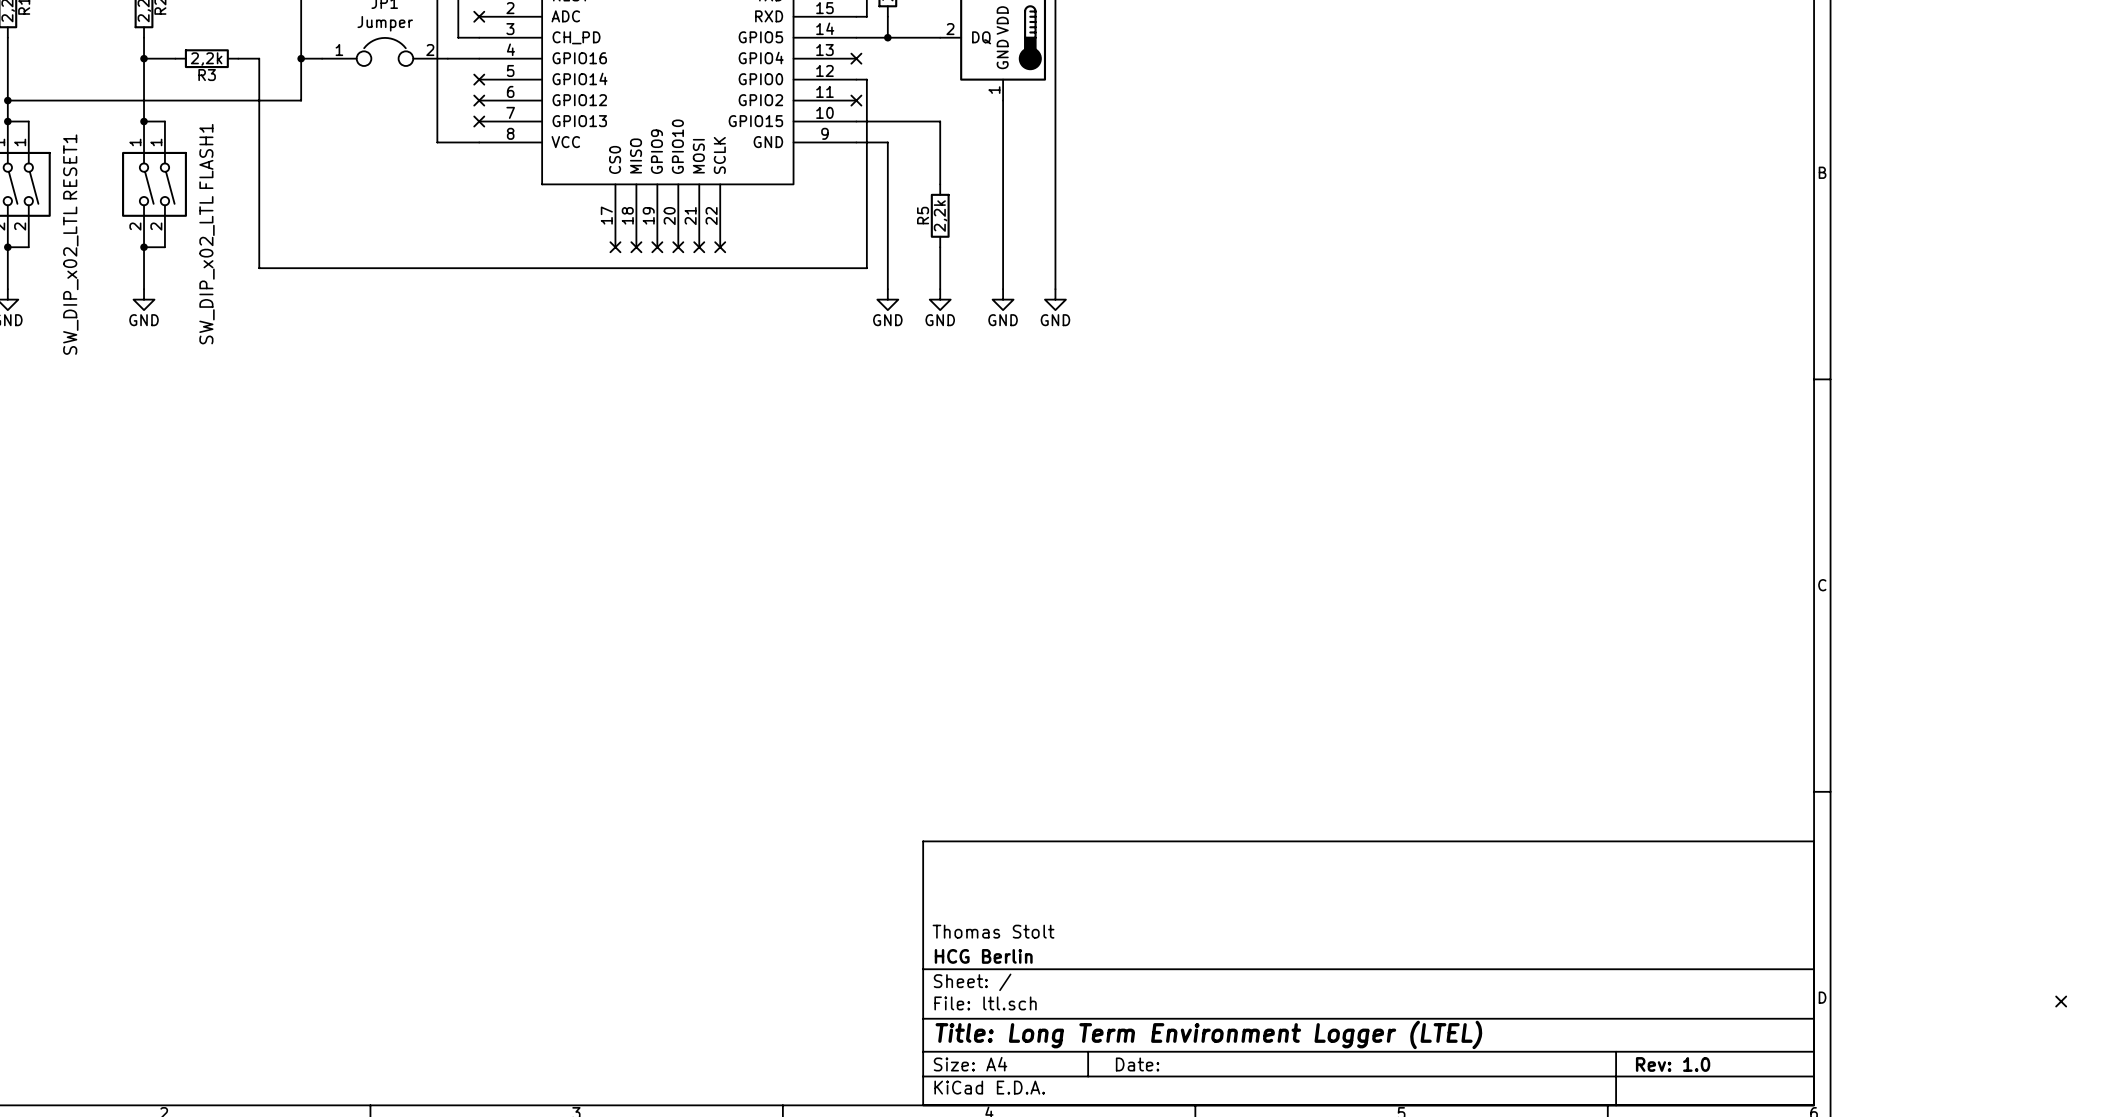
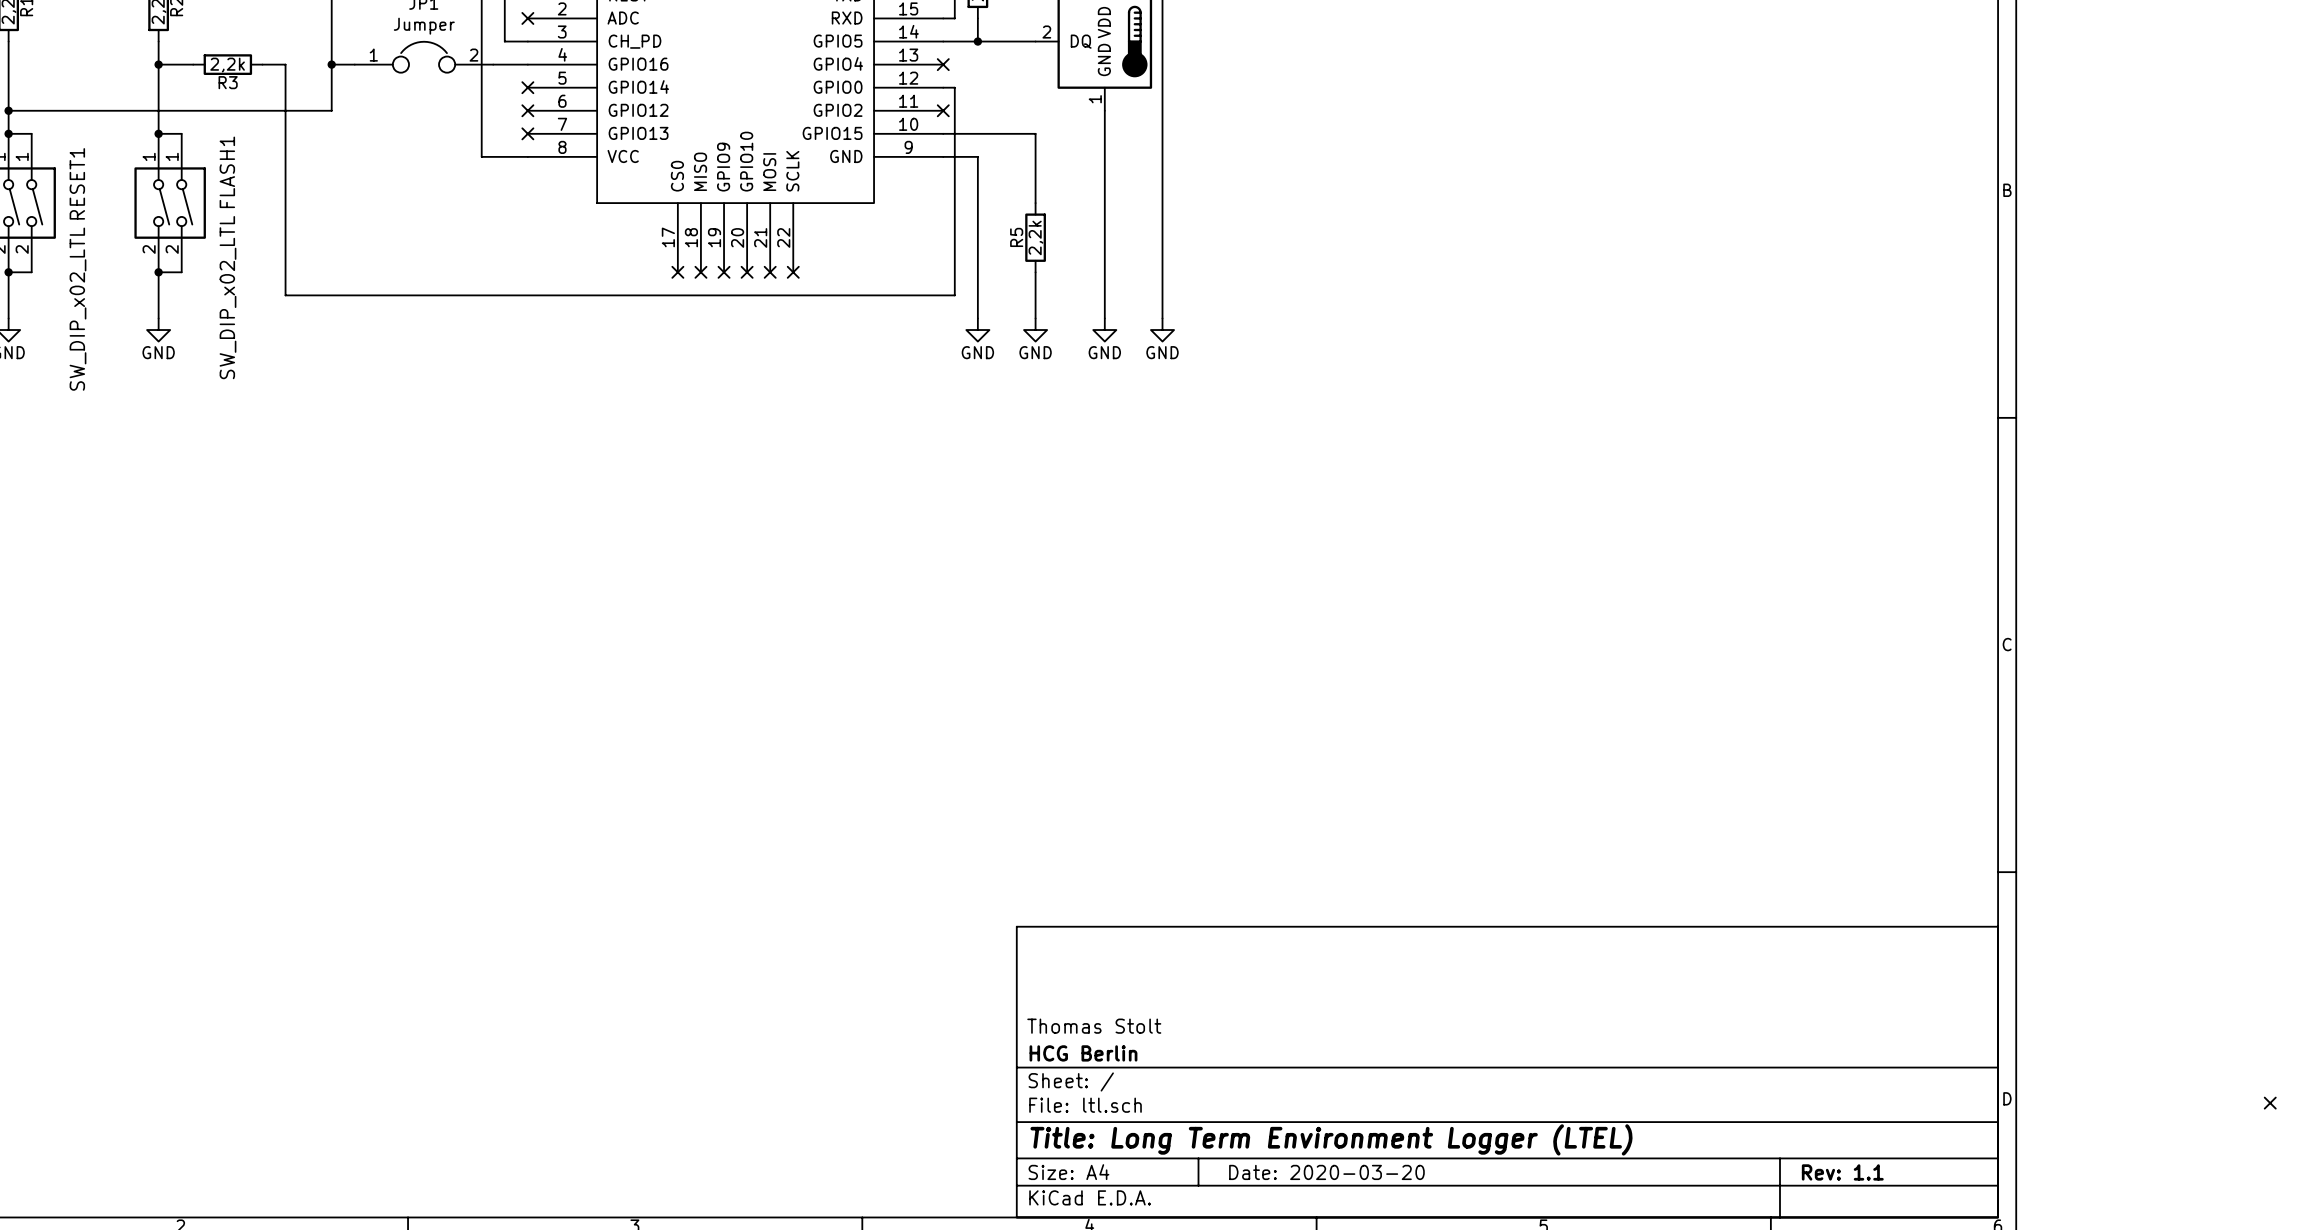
title block: Date: (1137, 1064) -> Date: 2020-03-20 (1326, 1172)
title block: Rev: 1.0 (1673, 1064) -> Rev: 1.1 (1842, 1172)

